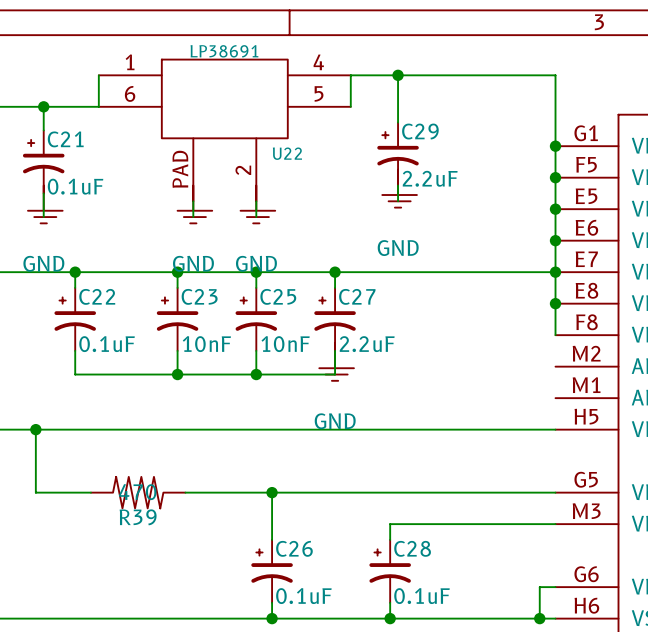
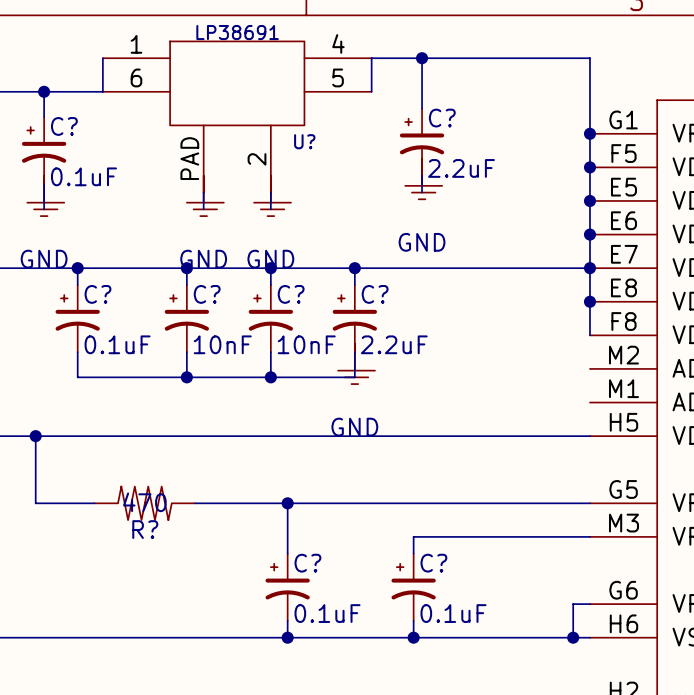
C29 name: C29 (420, 131) -> C? (442, 118)
C21 name: C21 (65, 139) -> C? (64, 126)
U22 name: U22 (287, 153) -> U? (304, 141)
C22 name: C22 (97, 296) -> C? (97, 294)
C23 name: C23 (199, 296) -> C? (207, 294)
C25 name: C25 (278, 296) -> C? (291, 294)
C27 name: C27 (357, 296) -> C? (375, 294)
R39 name: R39 (138, 517) -> R? (145, 529)
C26 name: C26 (294, 548) -> C? (307, 563)
C28 name: C28 (412, 548) -> C? (433, 563)

